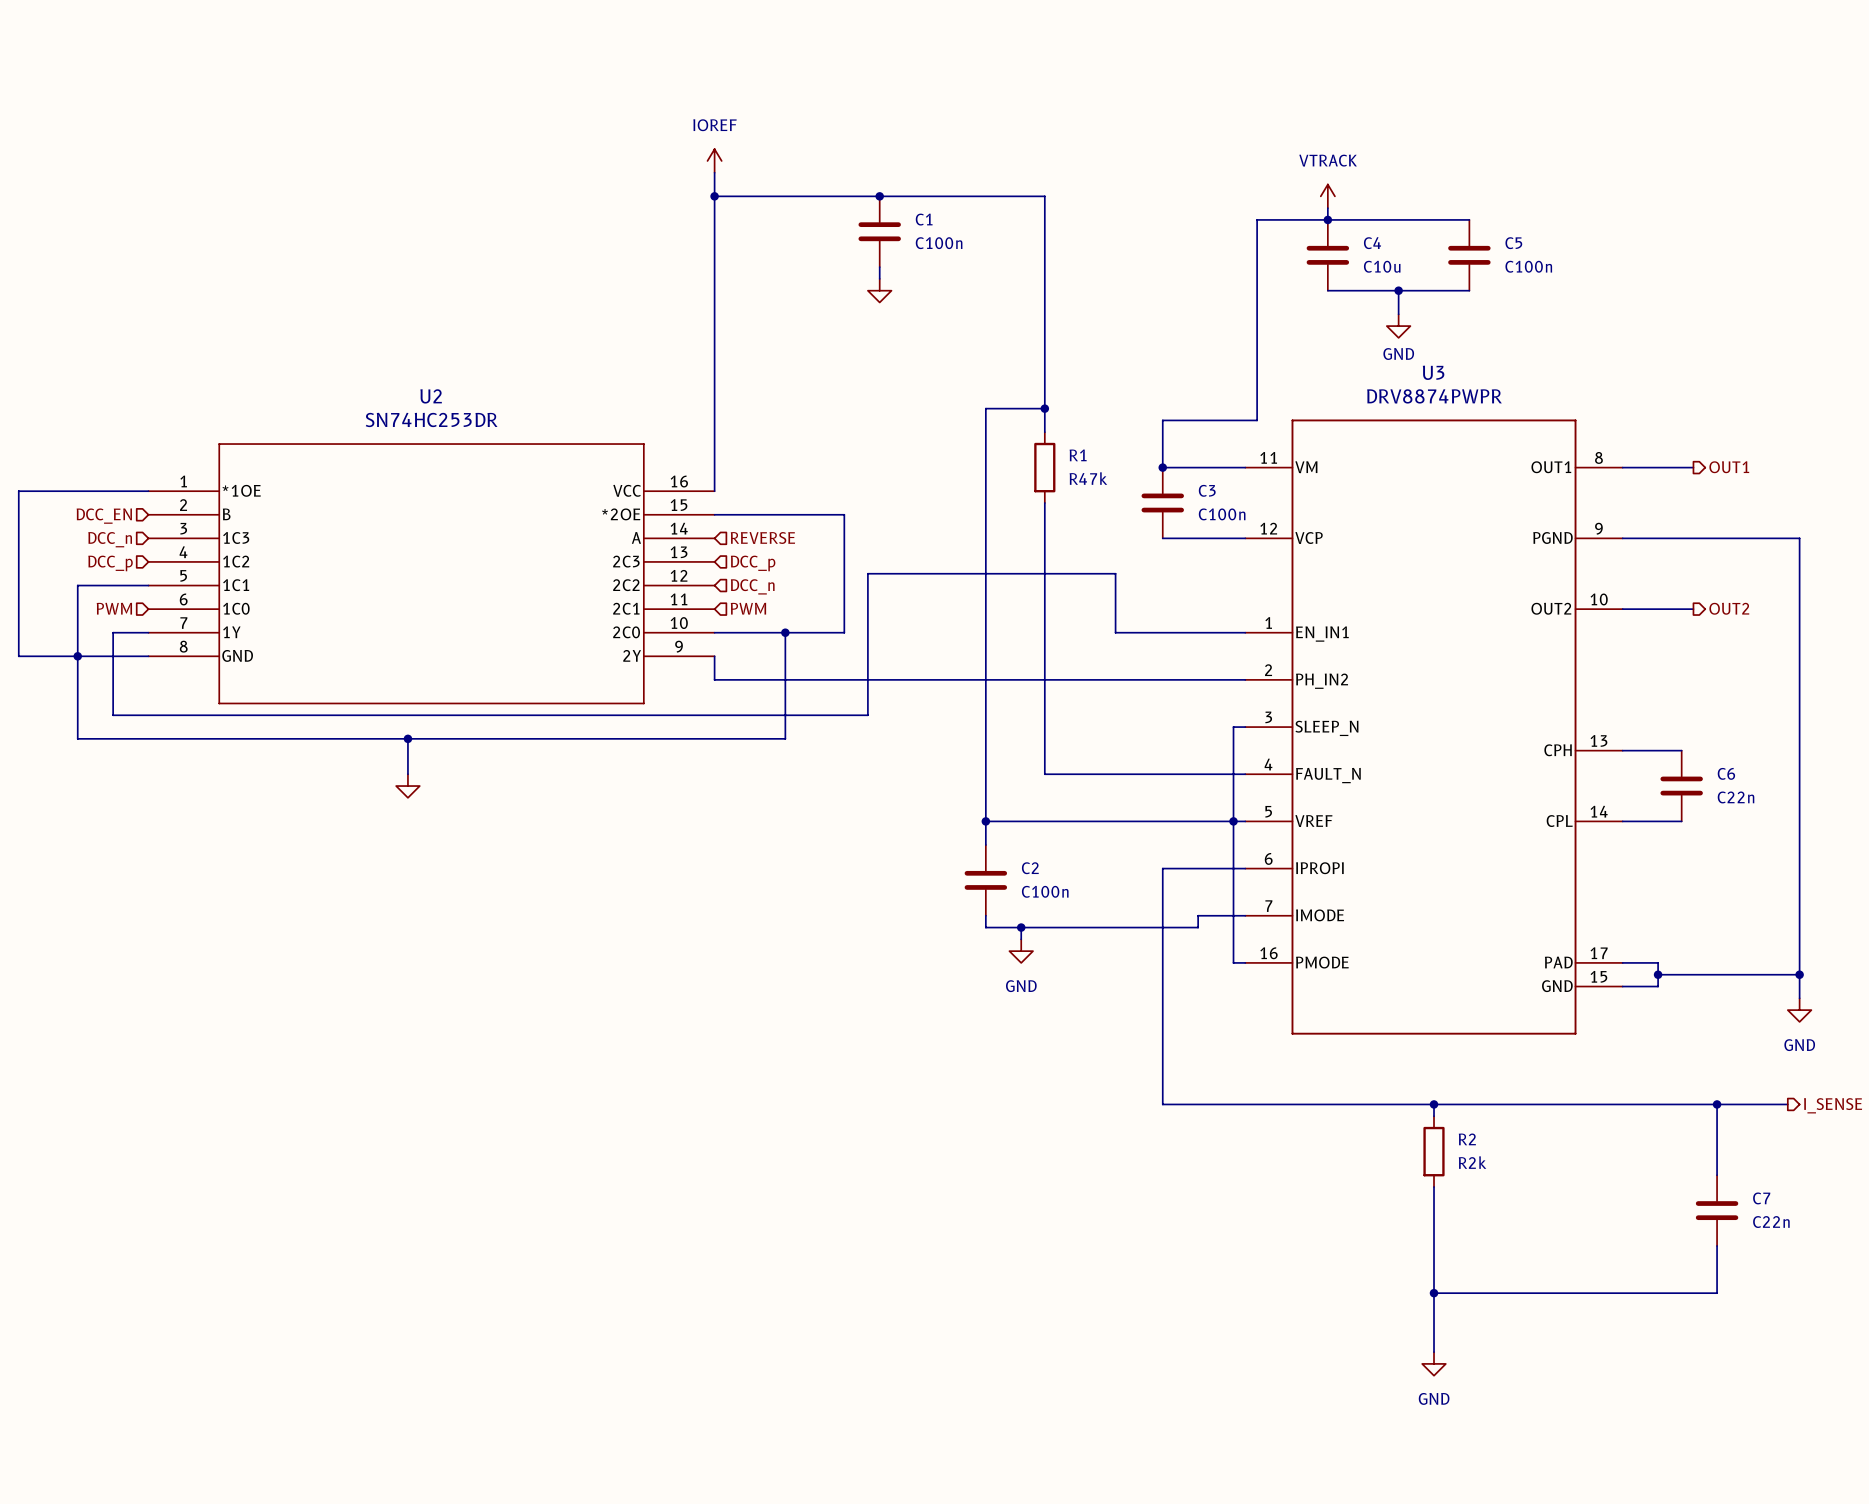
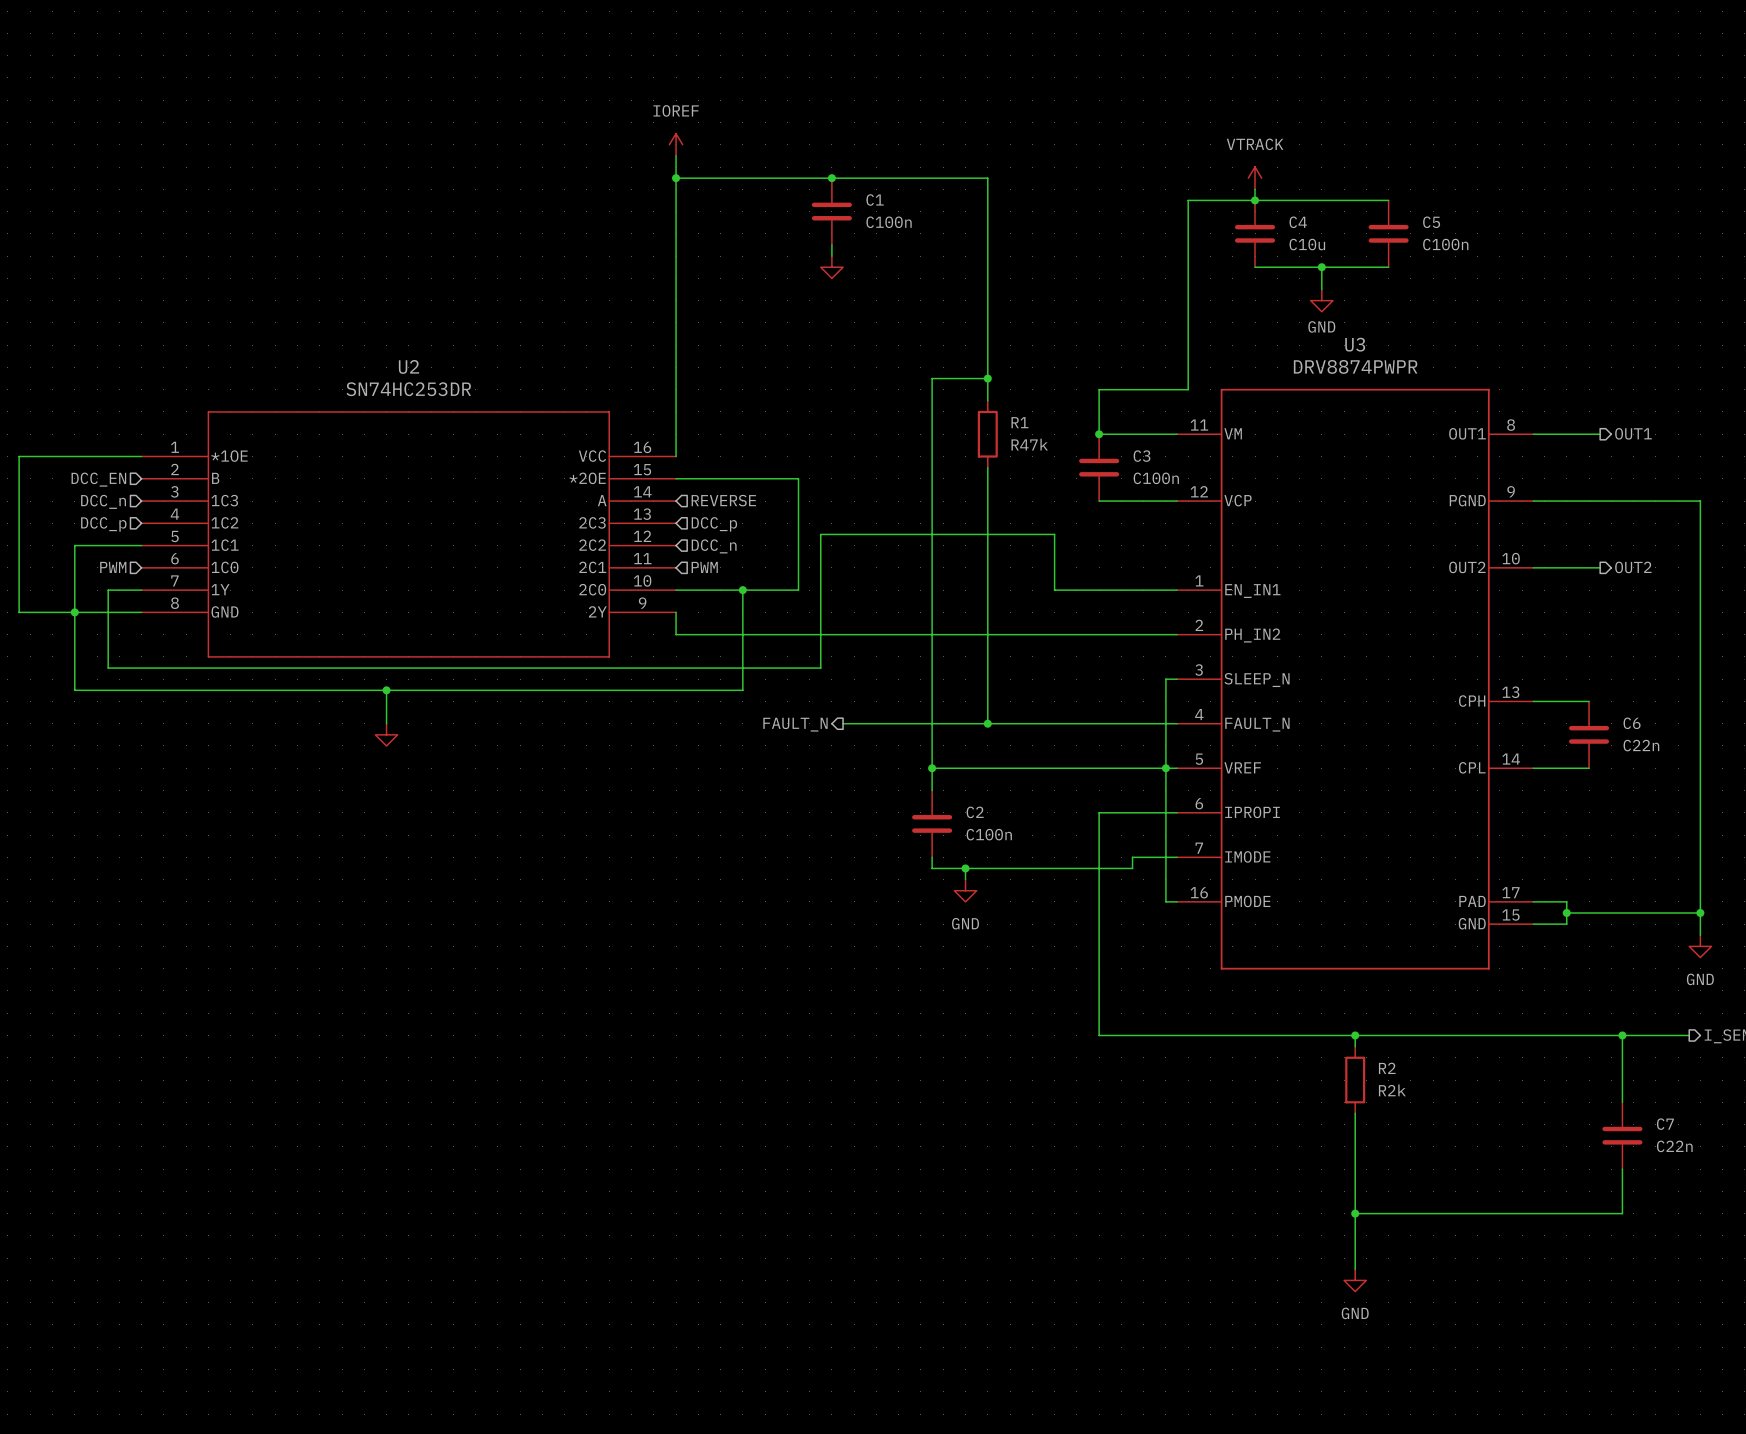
wire: none -> (843, 723) (987, 723)
junction: none -> (987, 723)
hierarchical label: none -> FAULT_N (795, 724)

